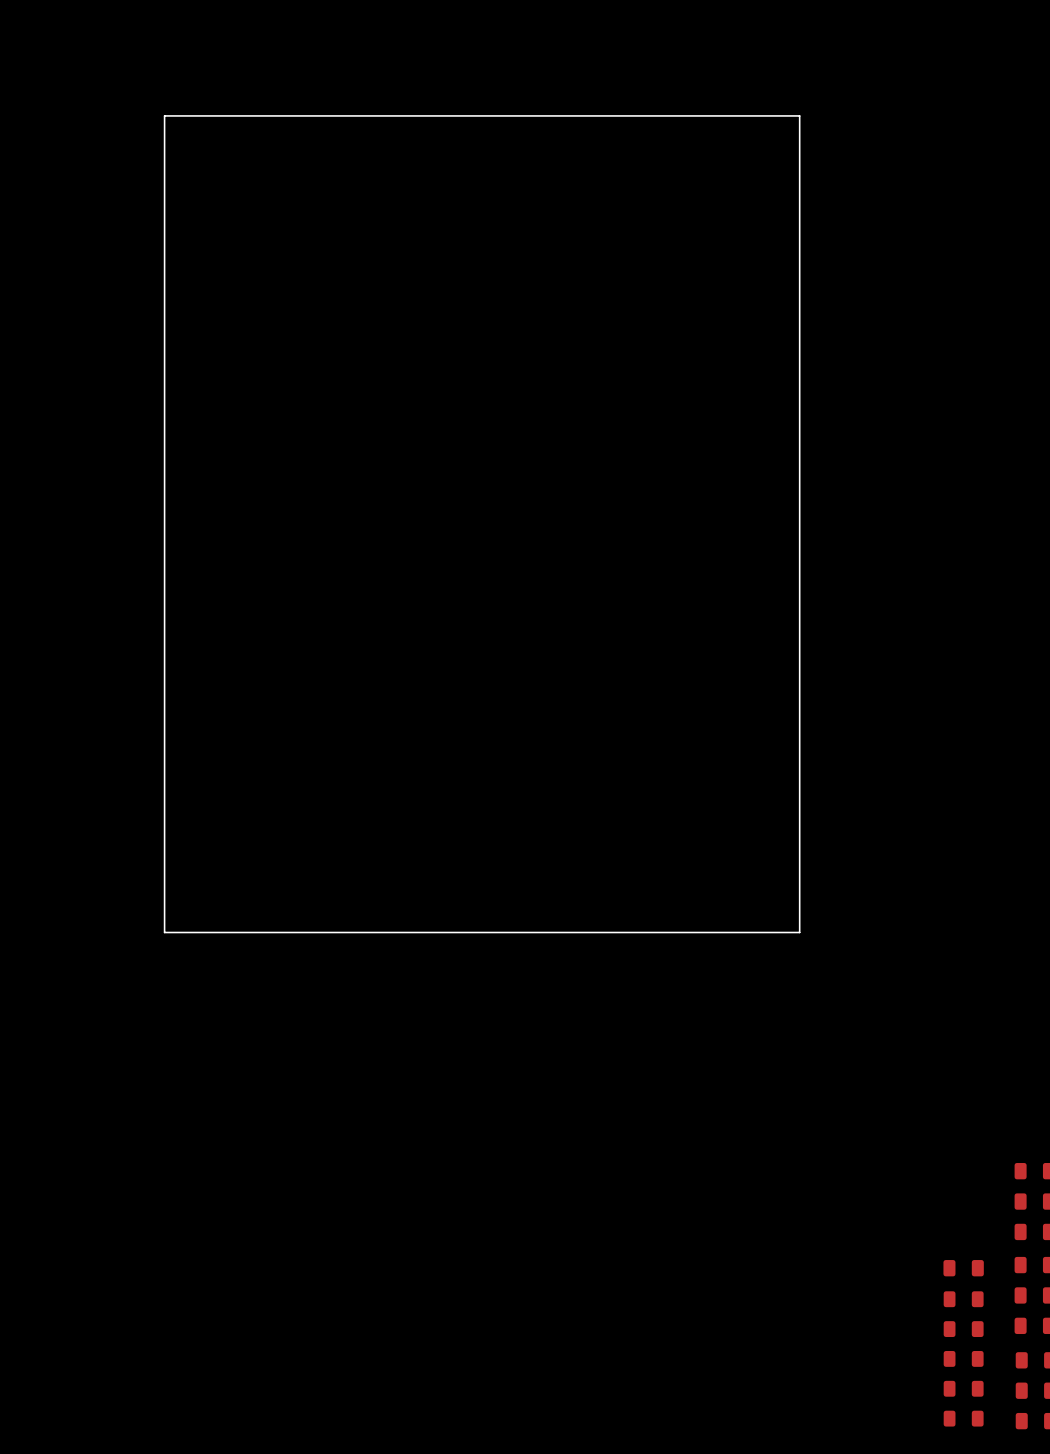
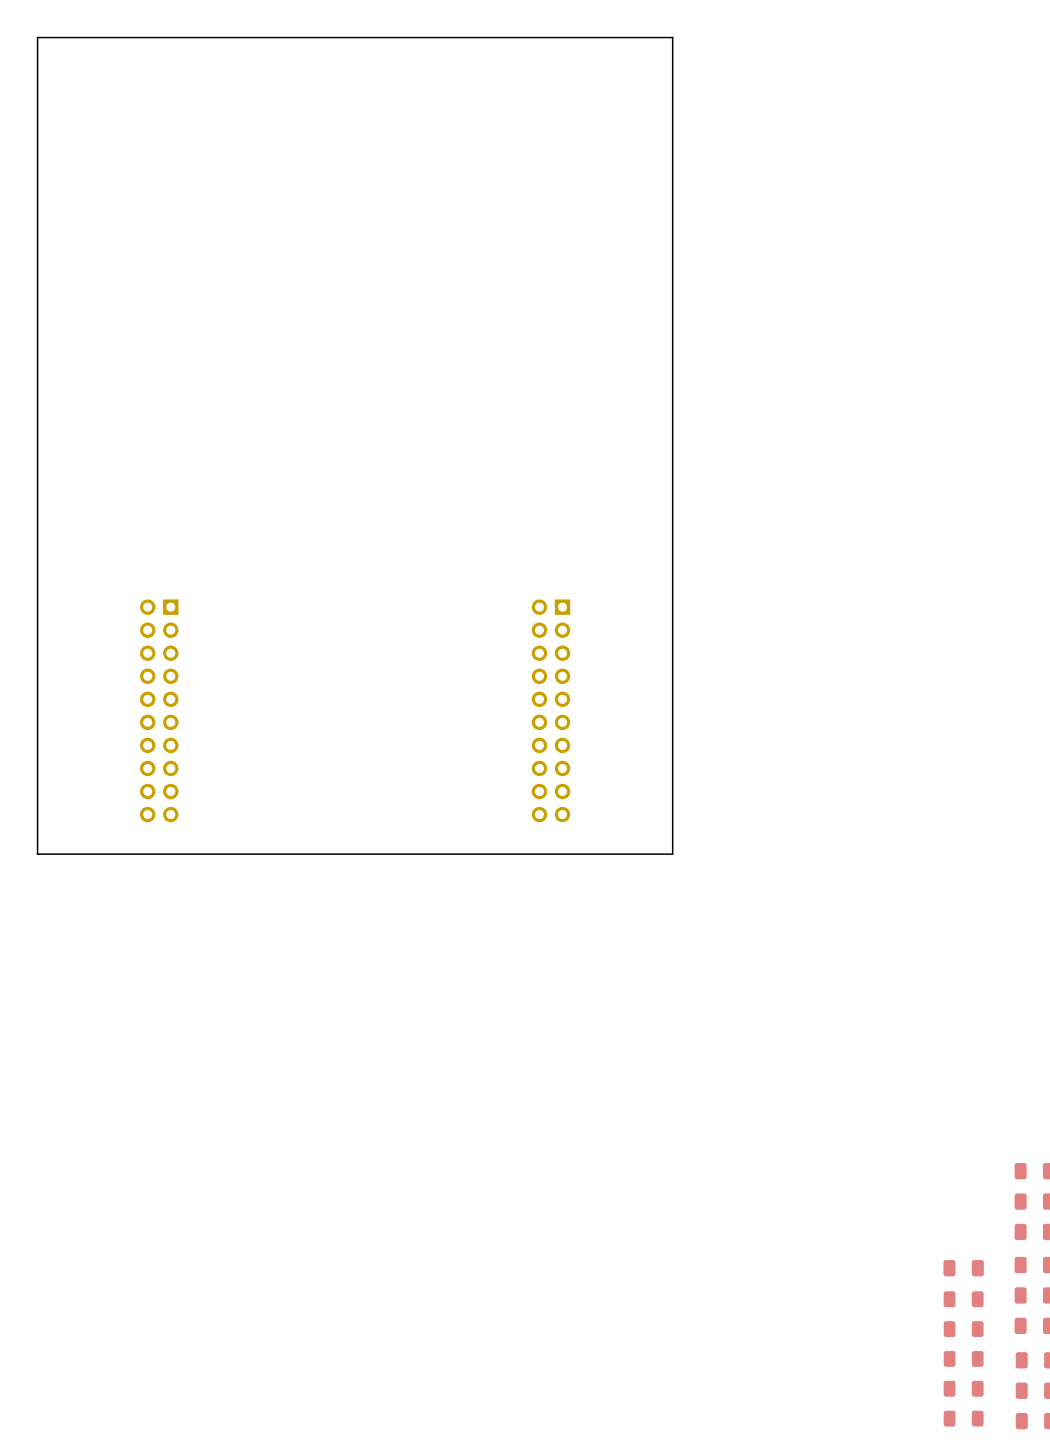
board edge: (799, 115) (164, 115) (164, 932) (799, 932) (799, 115) -> (672, 37) (37, 37) (37, 854) (672, 854) (672, 37)
part: none -> (159, 710)
part: none -> (551, 710)

